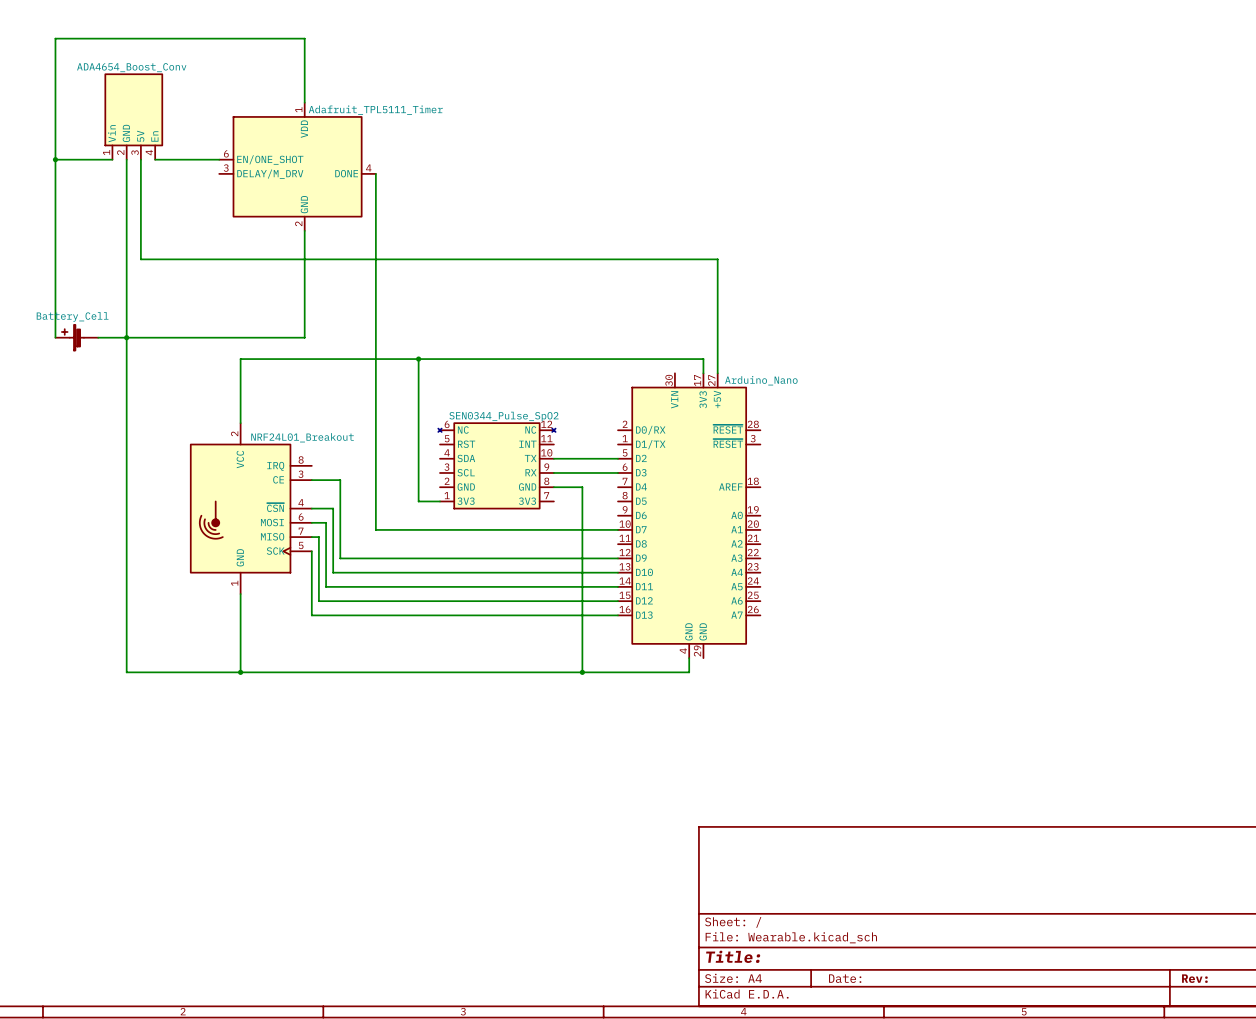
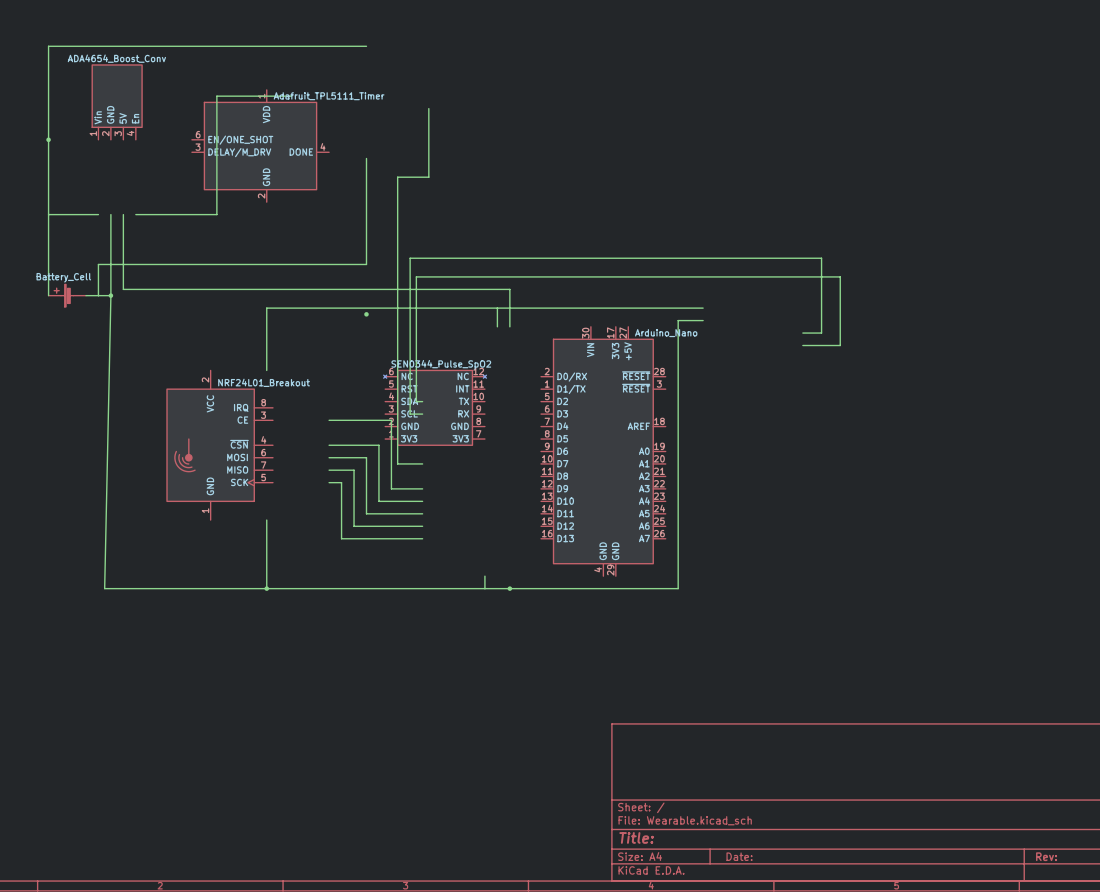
wire: (55, 52) (55, 38) (304, 38) (304, 102) -> (48, 46) (366, 46)
wire: none -> (291, 96) (216, 96) (216, 214) (135, 214)
wire: (55, 159) (112, 159) -> (48, 214) (98, 214)
wire: (126, 159) (126, 245) -> none
wire: (140, 159) (140, 245) -> none
wire: (155, 159) (219, 159) -> none
wire: (375, 173) (375, 529) (454, 529) -> (428, 108) (428, 177) (397, 177) (397, 463)
wire: none -> (366, 158) (366, 264) (98, 264) (98, 295)
wire: (304, 230) (304, 337) (126, 337) (126, 672) -> (110, 295) (104, 588) (110, 588)
wire: (140, 259) (717, 259) (717, 373) -> (123, 227) (123, 289) (509, 289) (509, 326)
wire: none -> (497, 308) (497, 326)
wire: none -> (703, 308) (266, 308) (266, 370)
wire: (418, 359) (418, 501) (439, 501) -> none
wire: (703, 373) (703, 359) (240, 359) (240, 423) -> none
wire: none -> (802, 333) (821, 333) (821, 258) (410, 258) (410, 414) (422, 414)
wire: none -> (802, 345) (840, 345) (840, 276) (416, 276) (416, 401) (422, 401)
wire: (553, 458) (617, 458) -> none
wire: (553, 472) (617, 472) -> none
wire: (311, 480) (340, 480) (340, 558) (447, 558) -> (329, 420) (391, 420) (391, 488)
wire: (553, 487) (582, 487) (582, 672) -> none
wire: (311, 508) (333, 508) (333, 572) (432, 572) -> (329, 445) (378, 445) (378, 501)
wire: (311, 522) (326, 522) (326, 586) (418, 586) -> (329, 457) (366, 457) (366, 513)
wire: (482, 529) (617, 529) -> none
wire: (311, 537) (318, 537) (318, 601) (404, 601) -> (329, 470) (354, 470) (354, 526)
wire: (311, 551) (311, 615) (390, 615) -> (329, 482) (341, 482) (341, 538)
wire: (482, 558) (617, 558) -> none
wire: (482, 572) (617, 572) -> none
wire: (482, 586) (617, 586) -> none
wire: (240, 594) (240, 672) -> (266, 520) (266, 588)
wire: (482, 601) (617, 601) -> none
wire: (482, 615) (617, 615) -> none
wire: none -> (484, 576) (484, 588)
wire: (689, 658) (689, 672) -> (703, 320) (678, 320) (678, 588) (603, 588)
junction: (240, 672) -> none
junction: none -> (266, 588)

